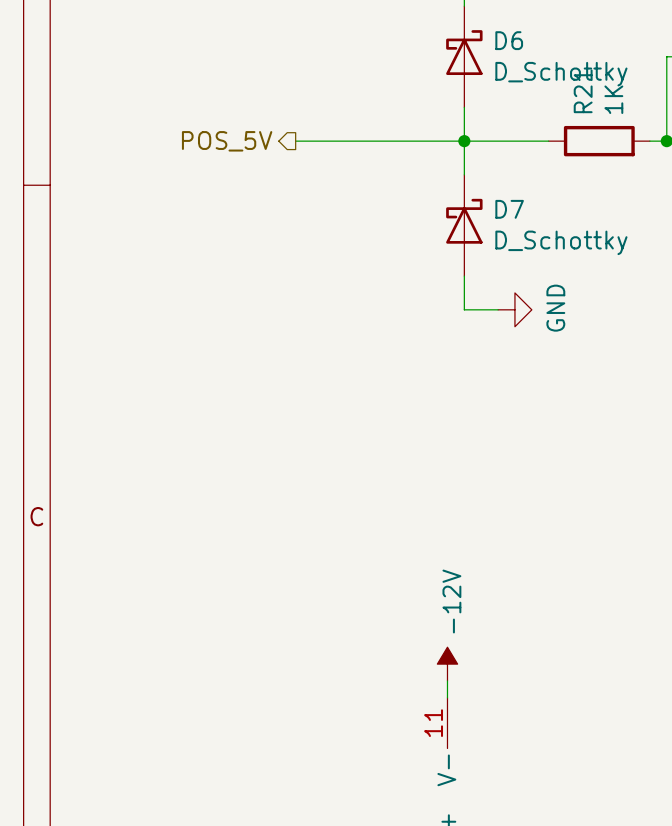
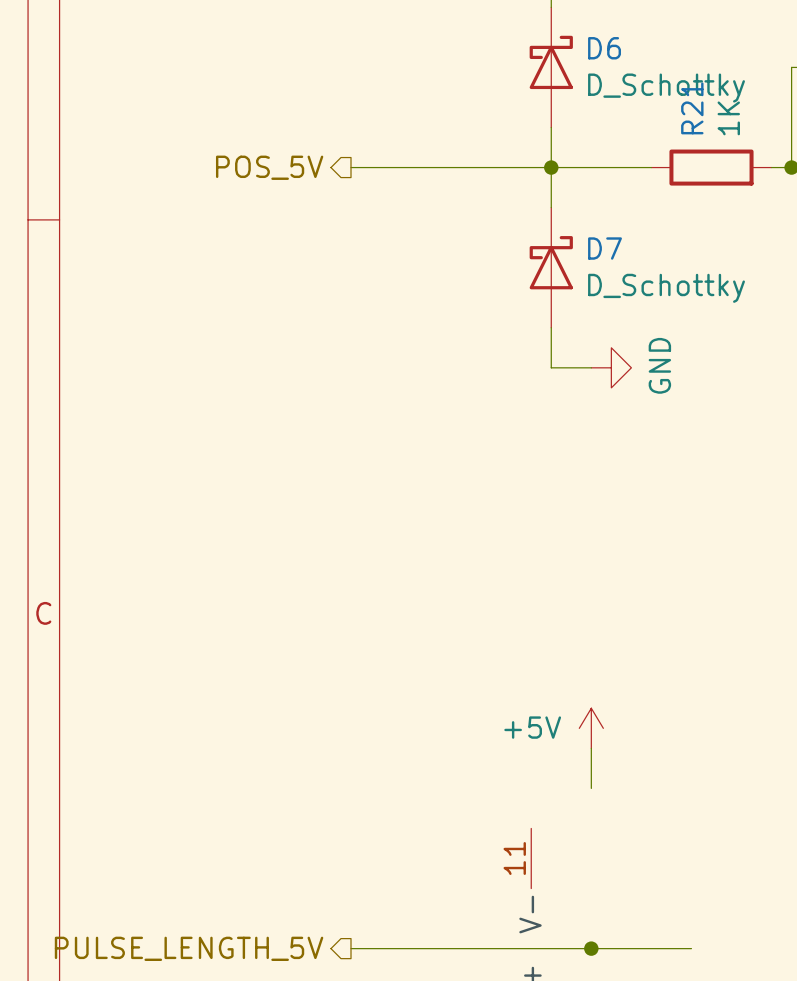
power symbol: none -> +5V (591, 728)
wire: none -> (591, 748) (591, 788)
power symbol: -12V (447, 664) -> none
wire: (447, 680) (447, 697) -> none
hierarchical label: none -> PULSE_LENGTH_5V (189, 948)
wire: none -> (351, 948) (691, 948)
junction: none -> (591, 948)

